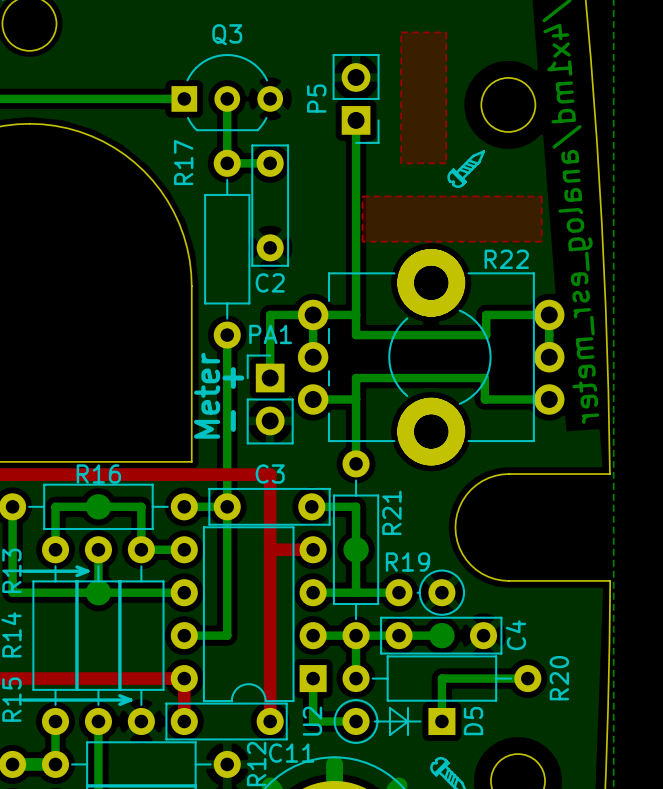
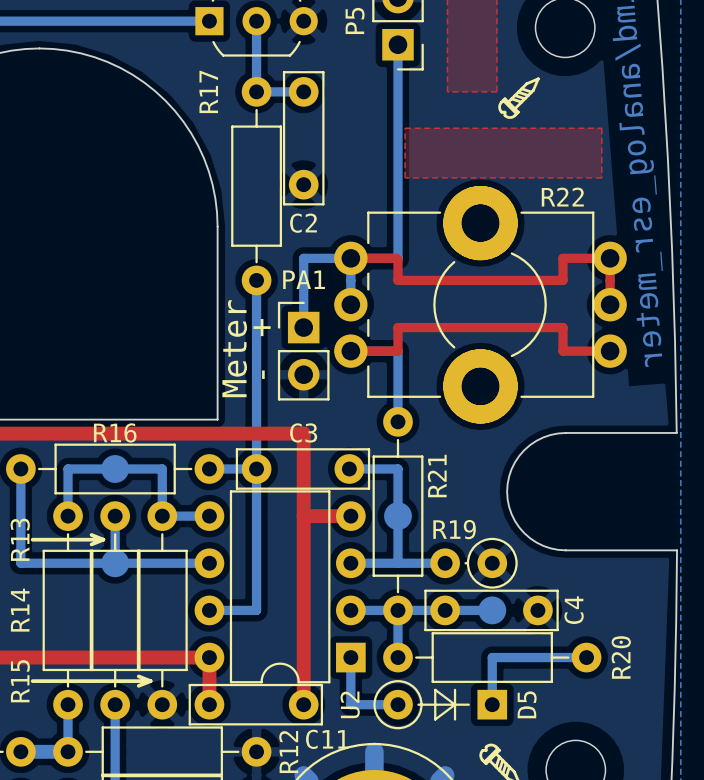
top track: none -> (350, 258) (396, 258) (397, 280) (562, 280) (562, 258) (610, 258) (610, 304)
bottom track: (356, 314) (356, 335) (486, 335) (486, 314) (549, 314) (549, 357) -> none
top track: none -> (350, 351) (397, 351) (397, 327) (562, 327) (562, 351) (610, 351)
bottom track: (356, 399) (356, 378) (484, 378) (484, 399) (549, 399) -> none

